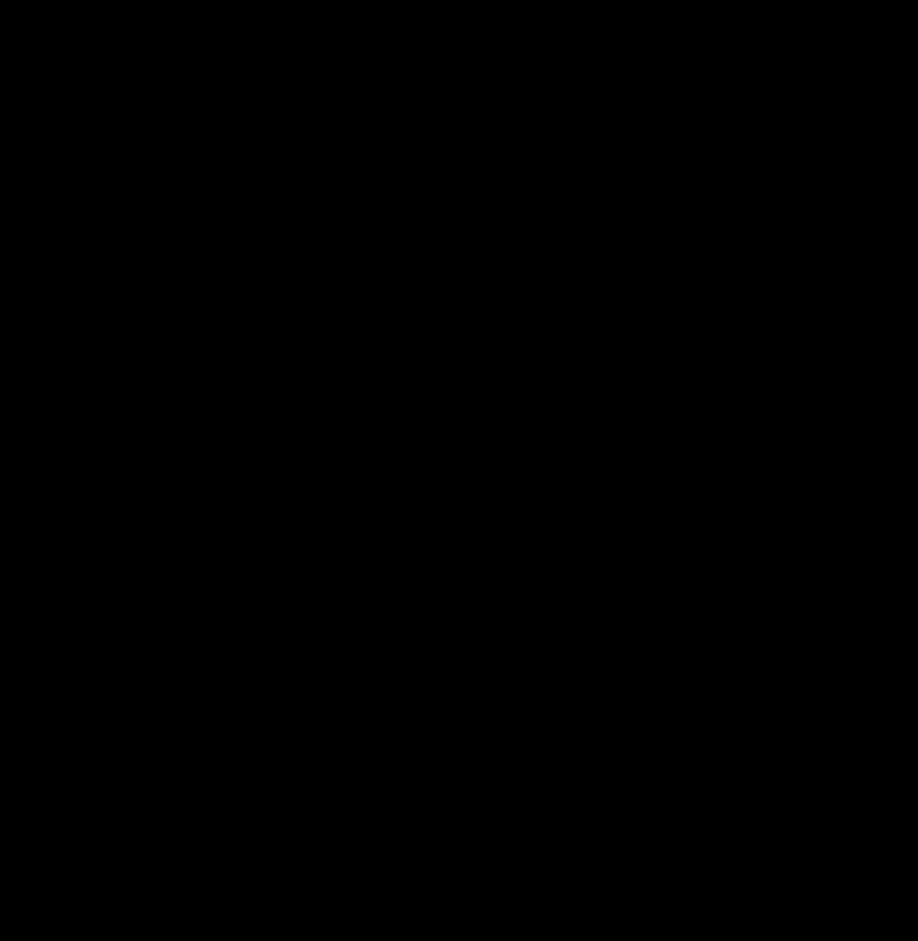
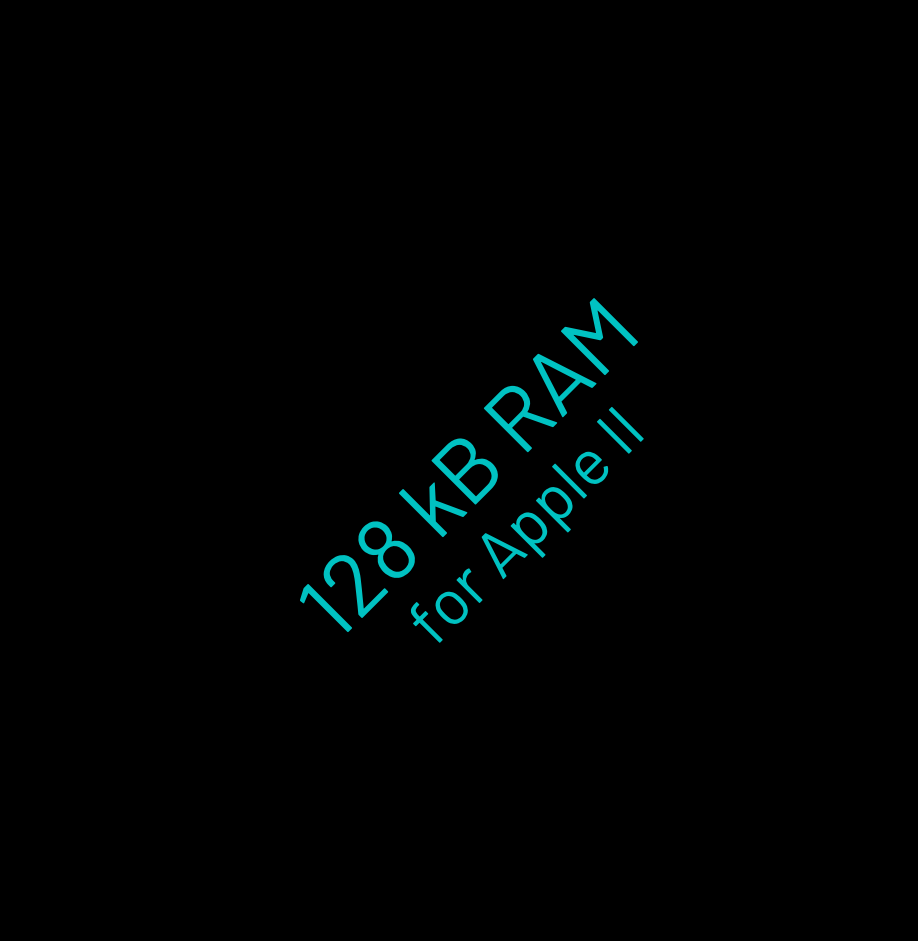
text: none -> 128 kB RAM (469, 465)
text: none -> for Apple II (527, 524)

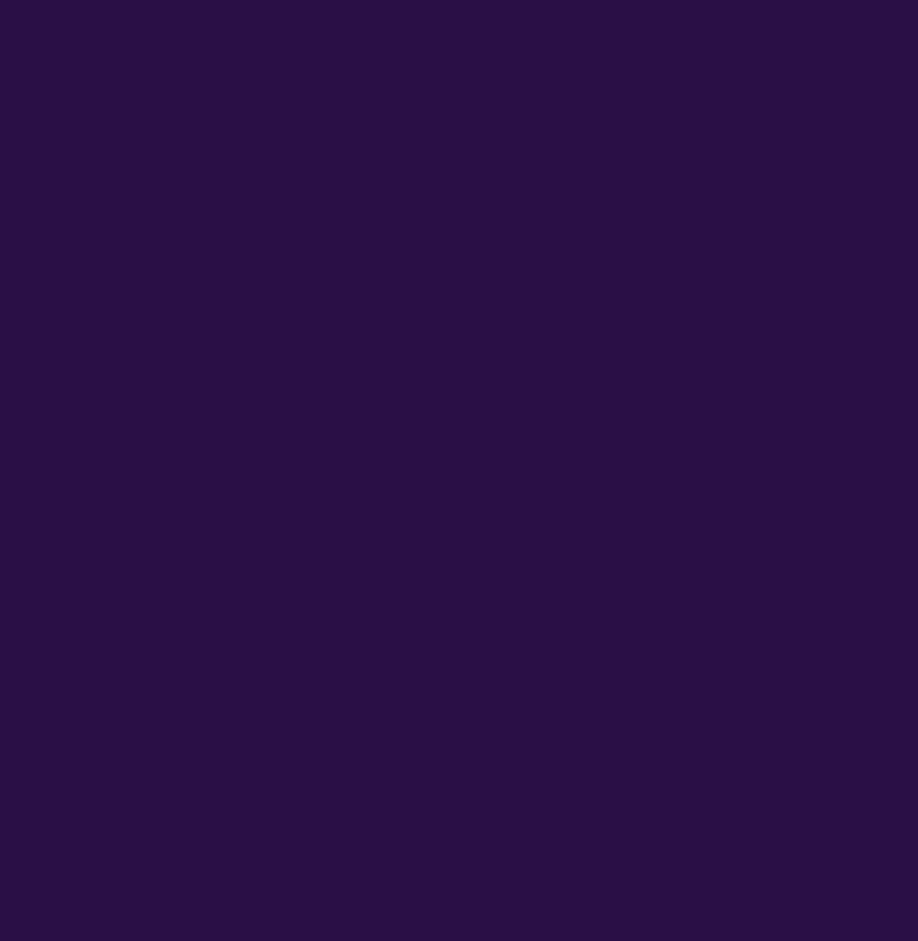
text: 128 kB RAM (469, 465) -> none
text: for Apple II (527, 524) -> none

